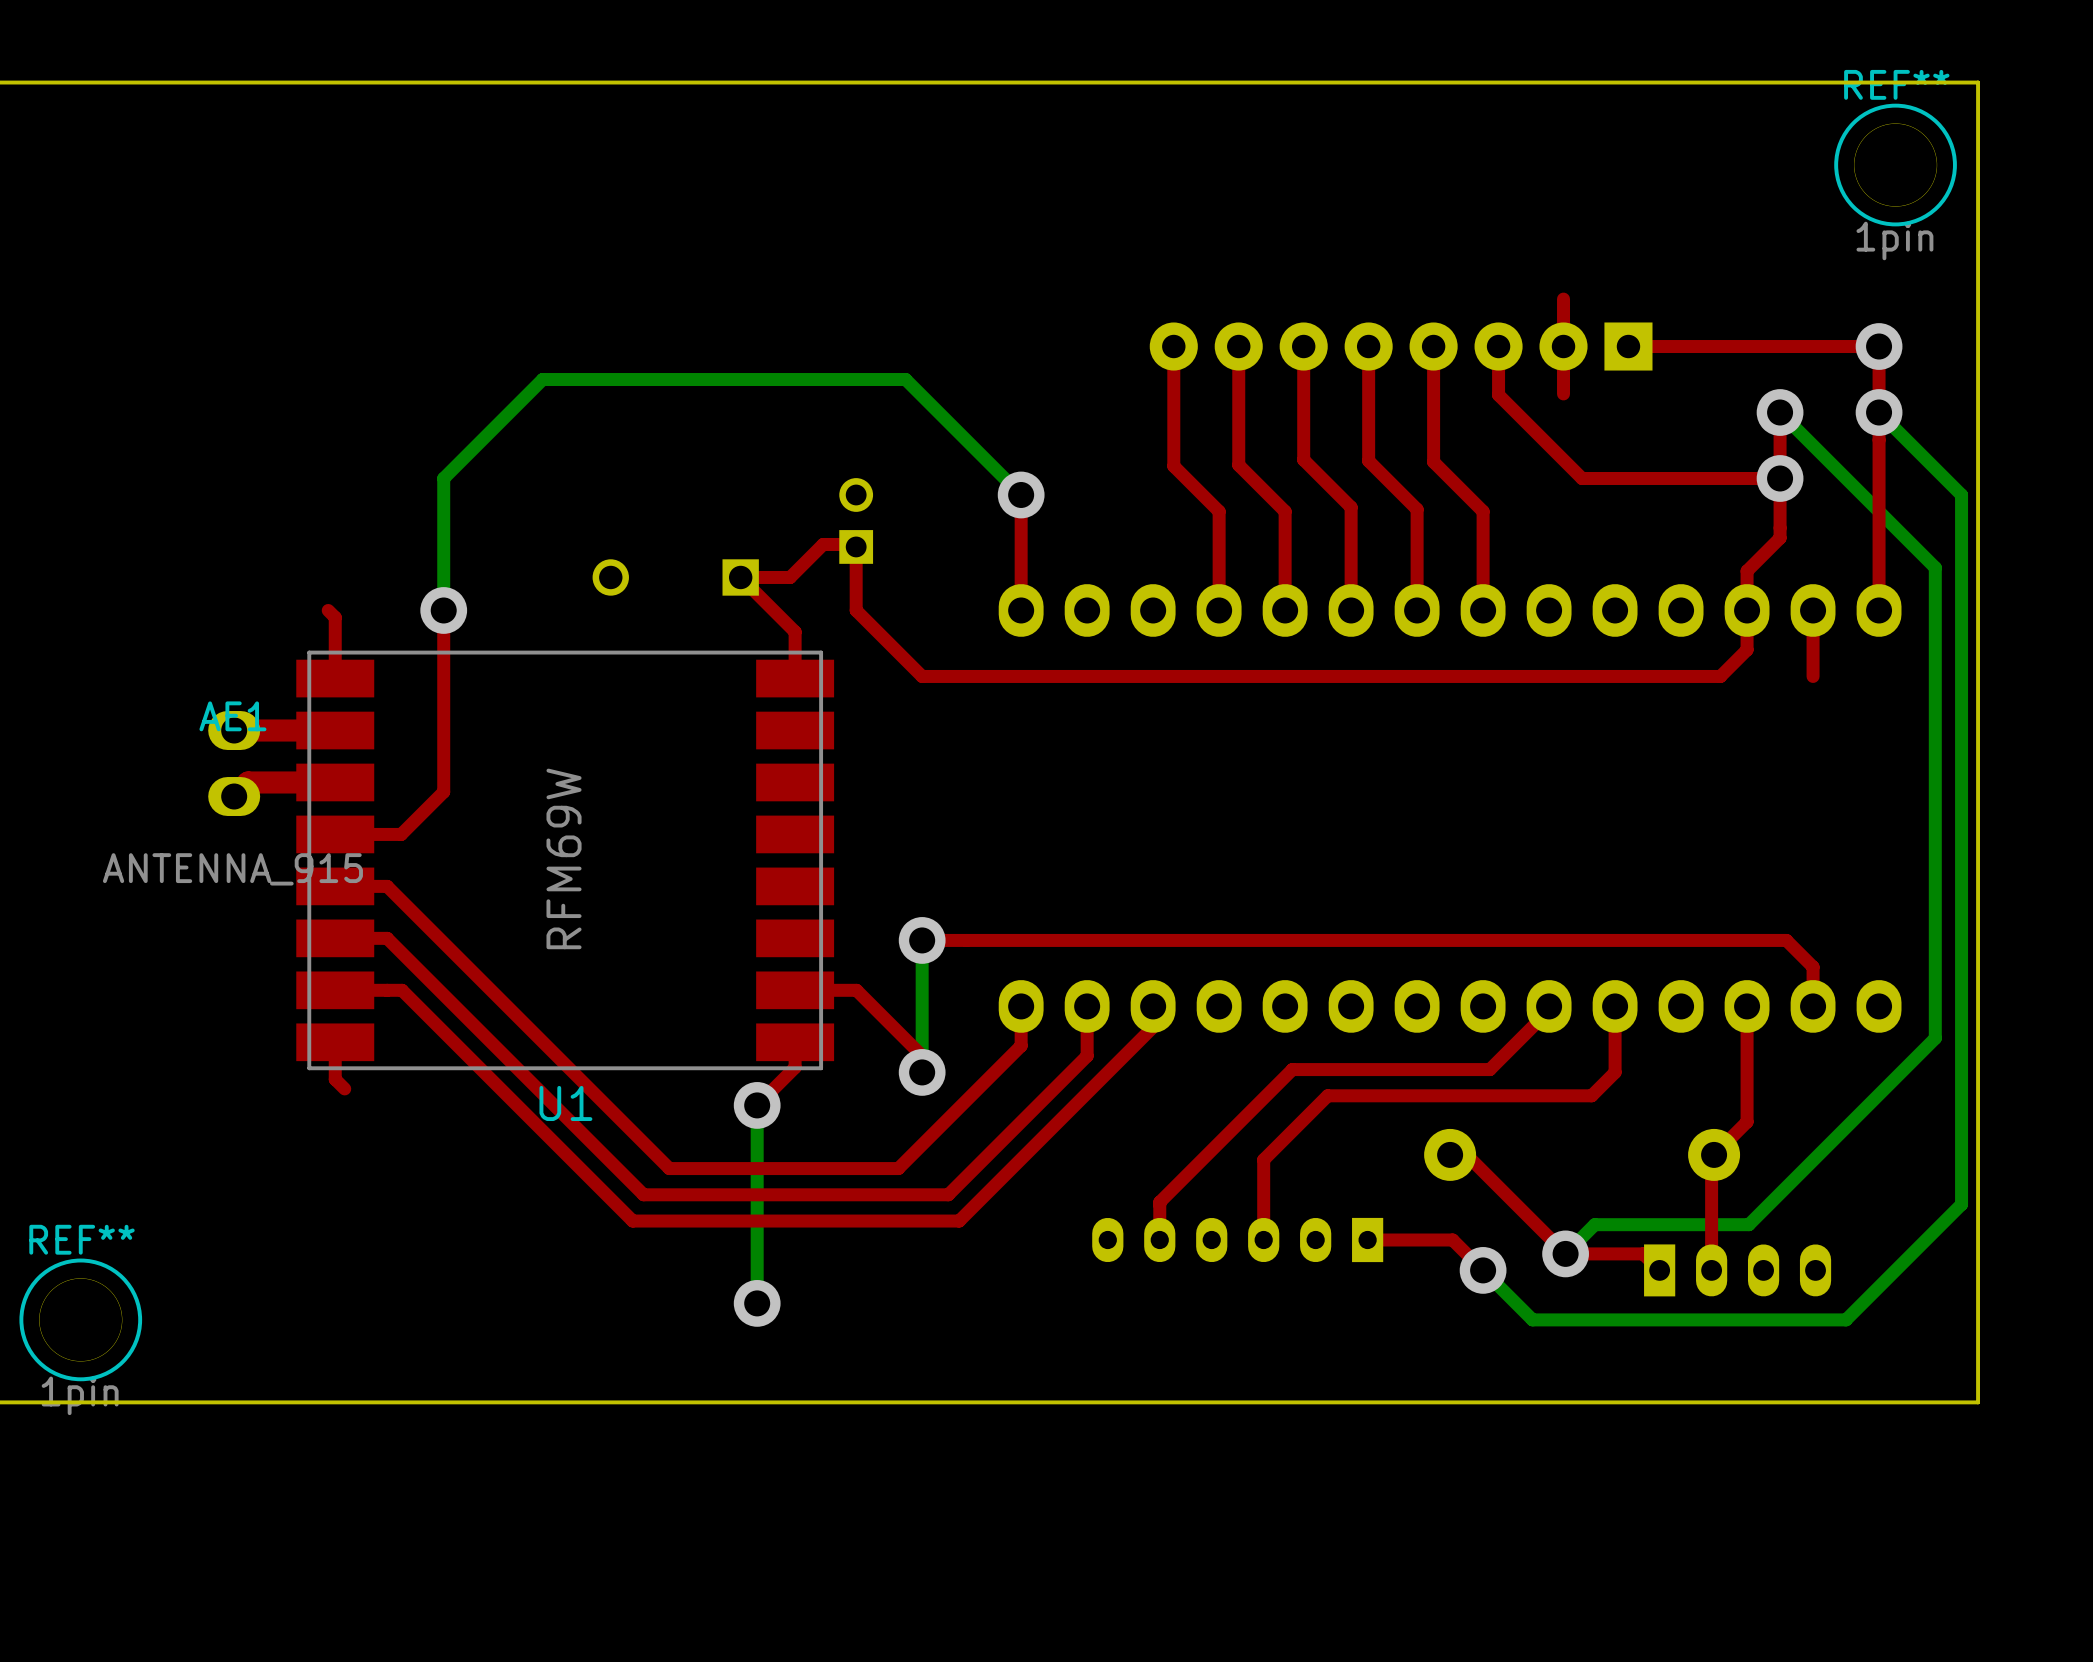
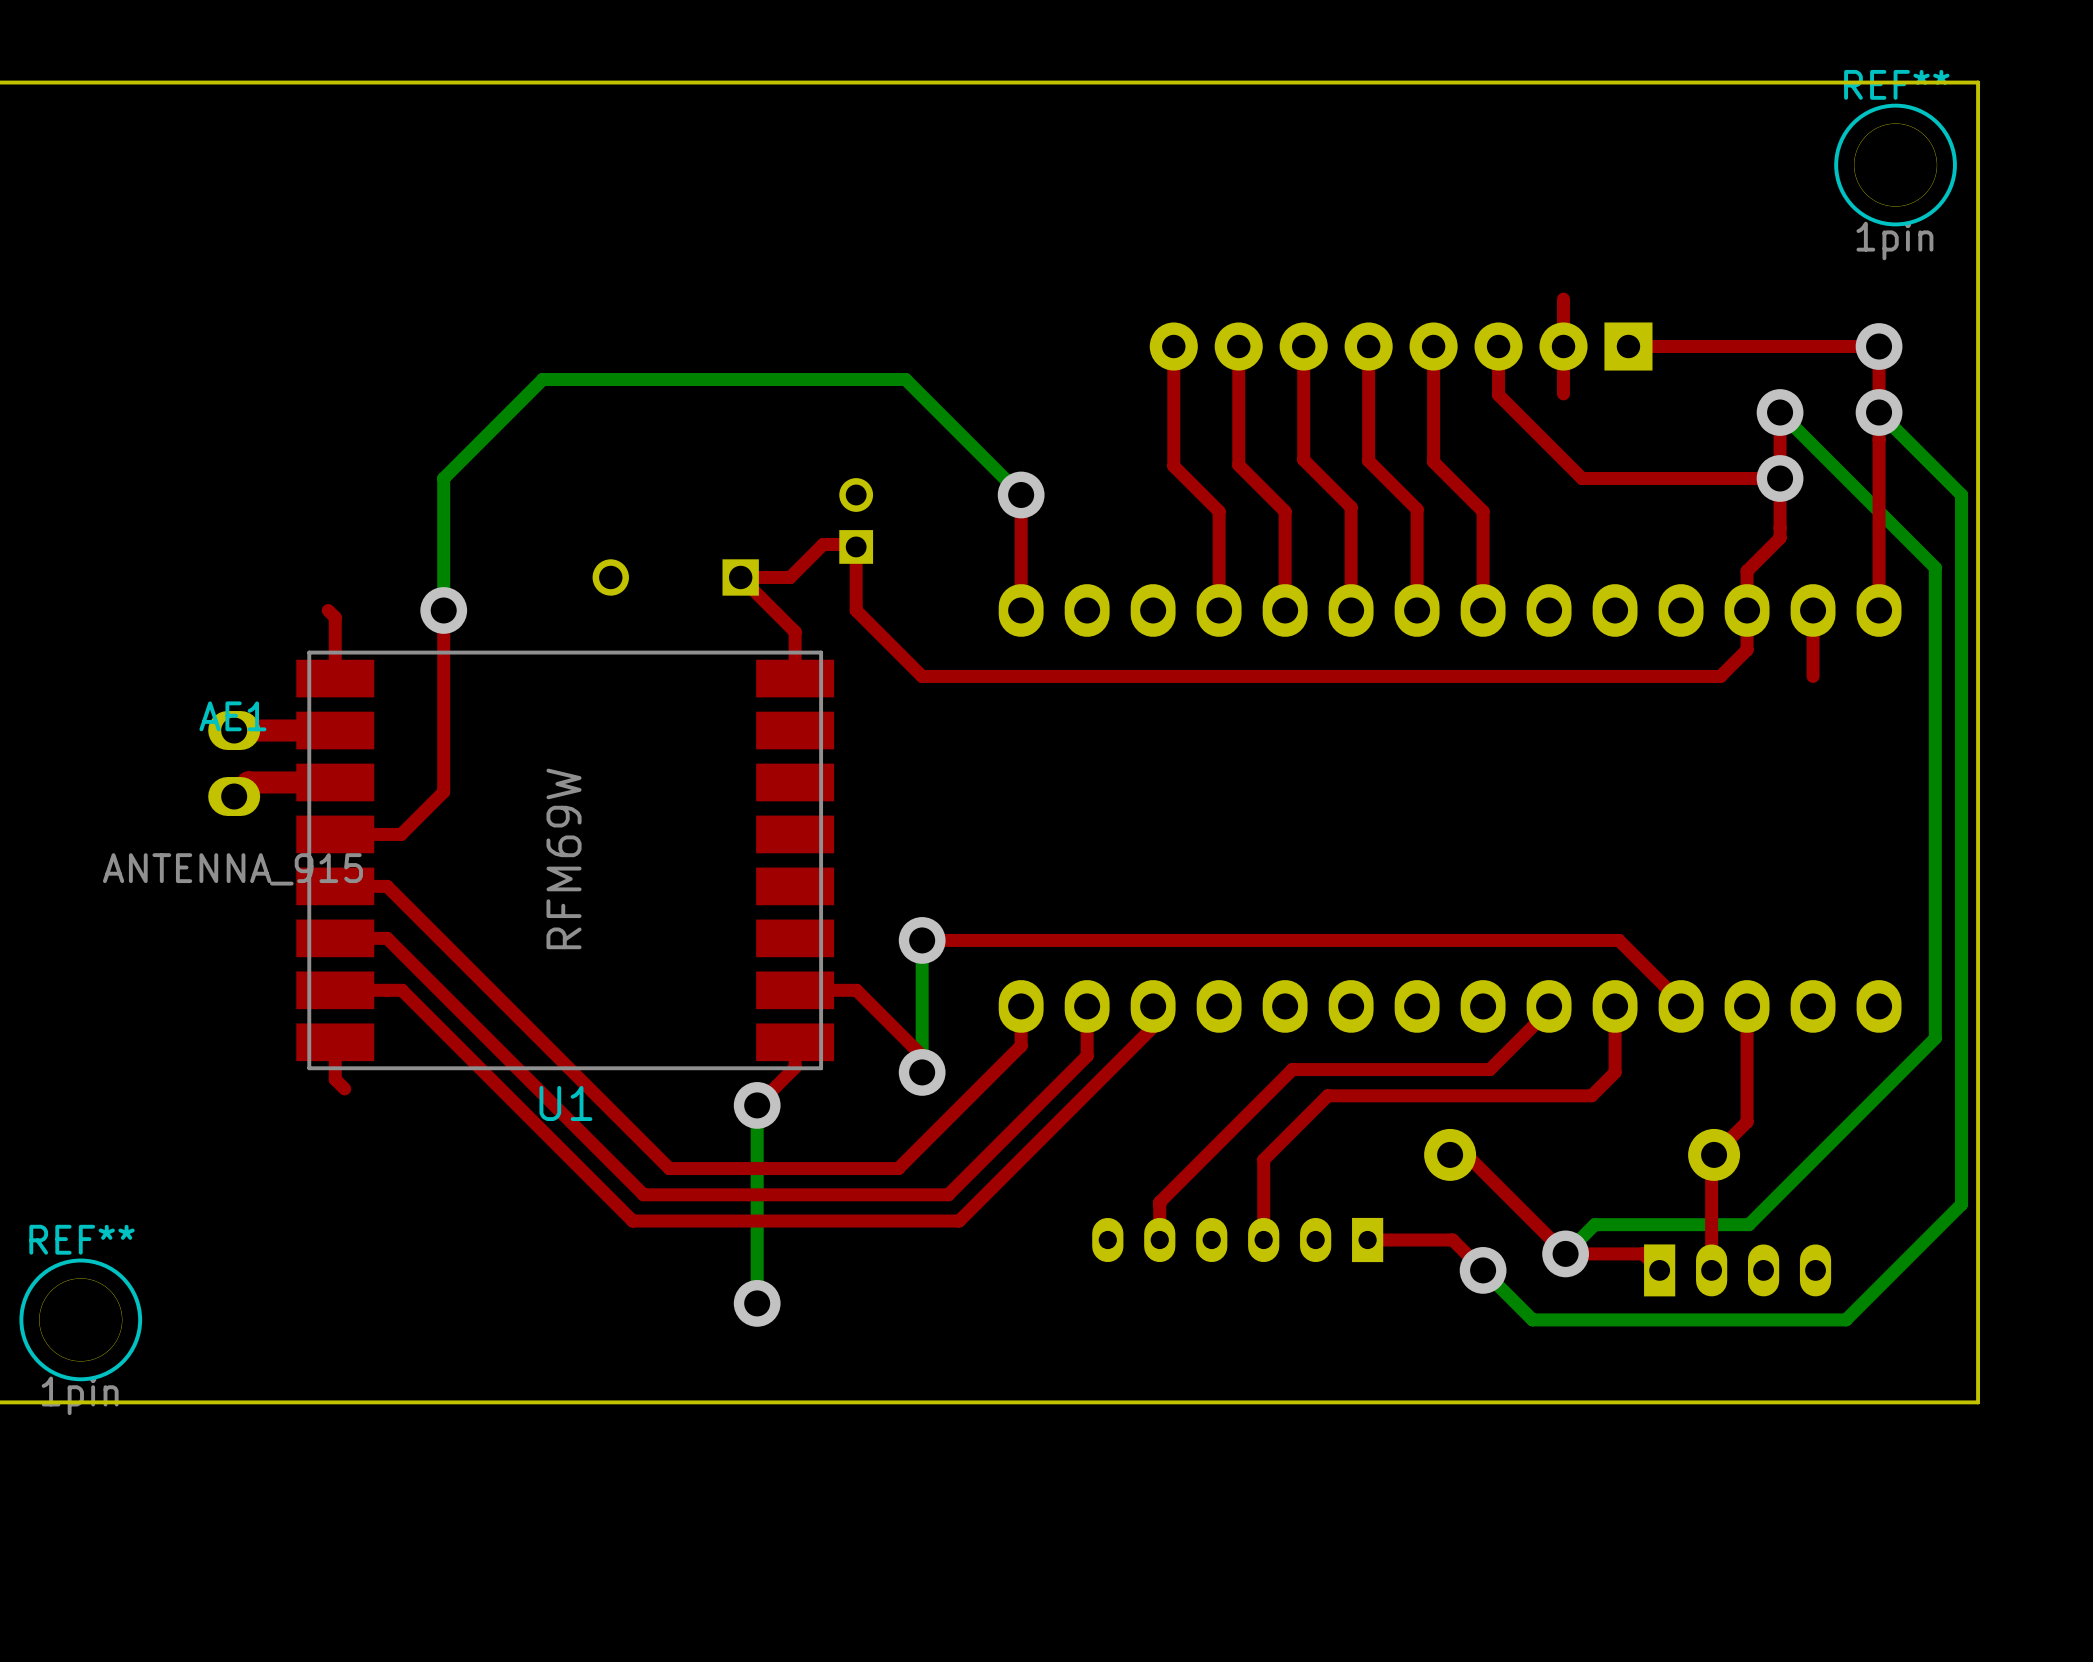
top track: (1619, 940) (1786, 940) (1813, 967) (1813, 1006) -> (1619, 940) (1681, 1002) (1681, 1006)

